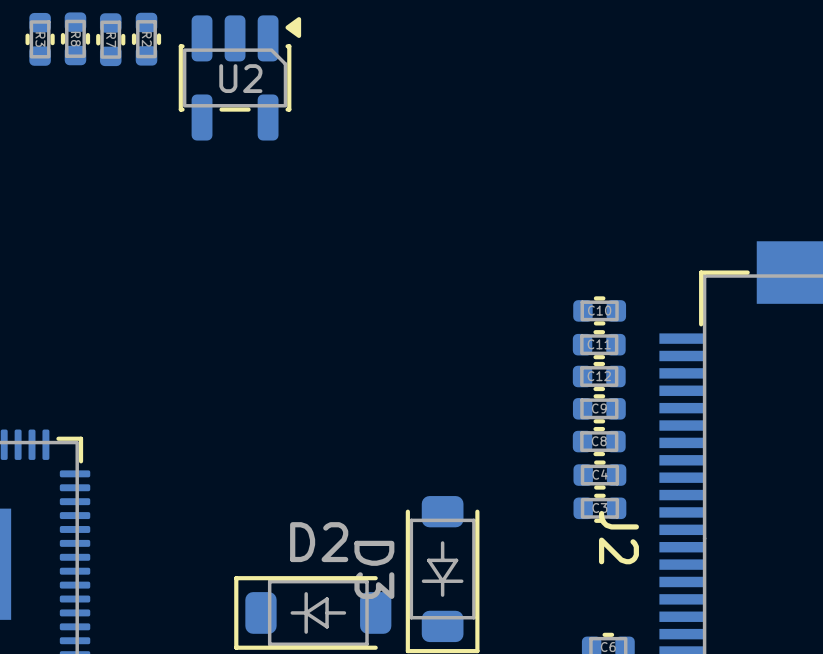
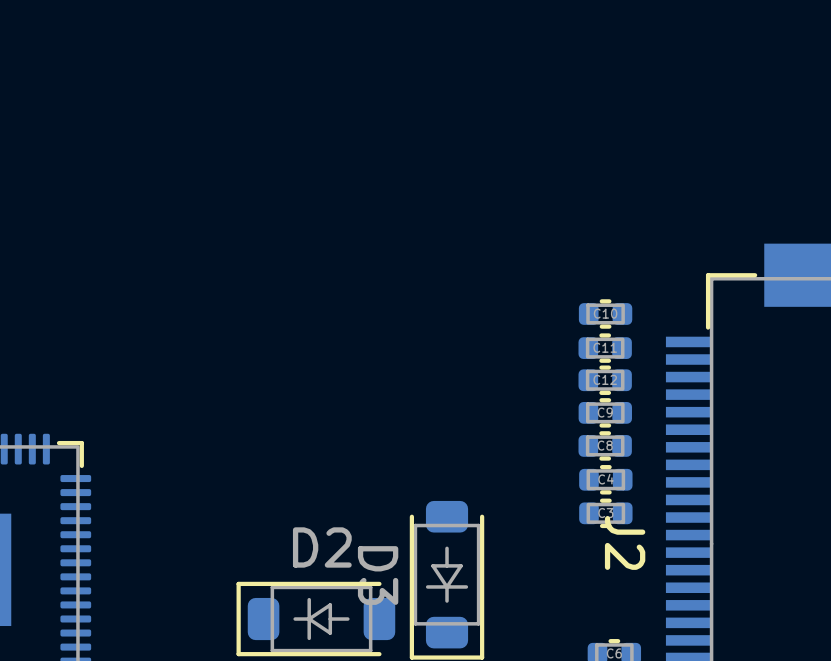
R8: (75, 38) -> none
R3: (40, 39) -> none
R7: (110, 39) -> none
R2: (146, 39) -> none
U2: (239, 77) -> none

